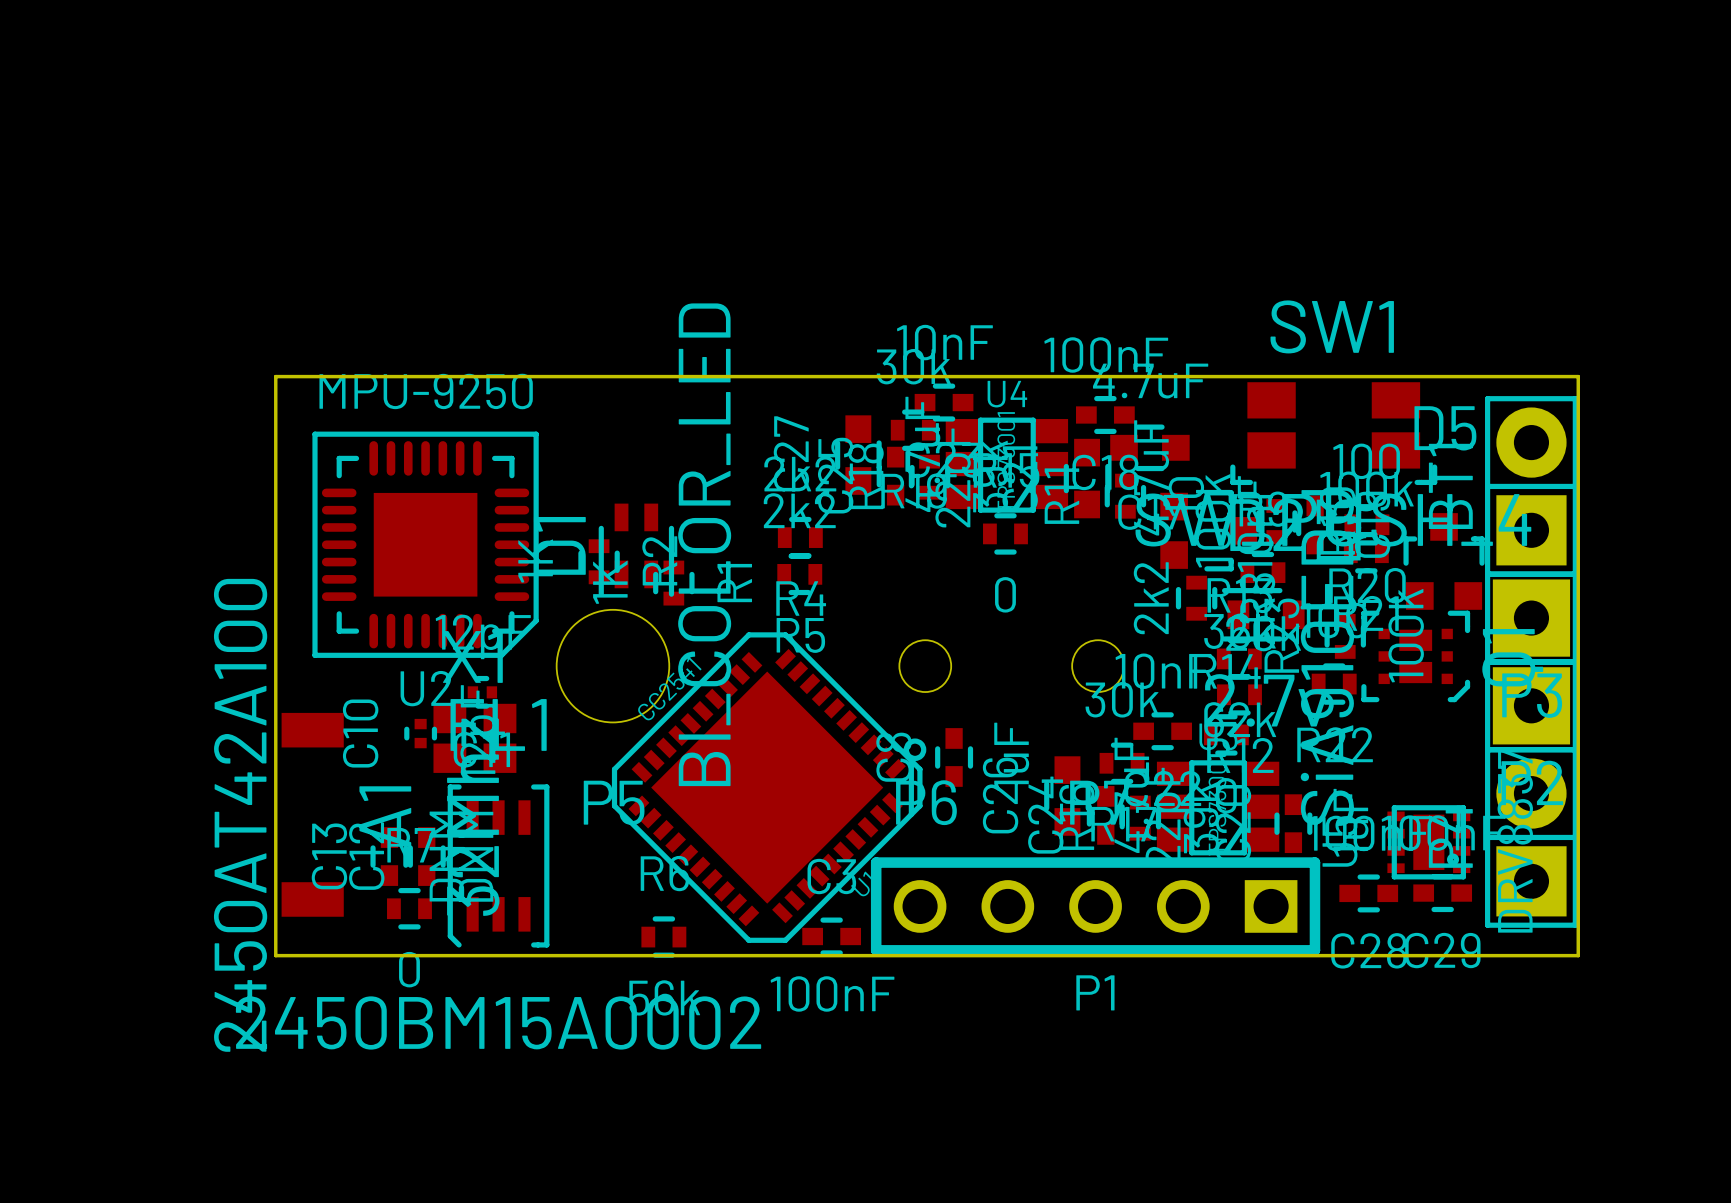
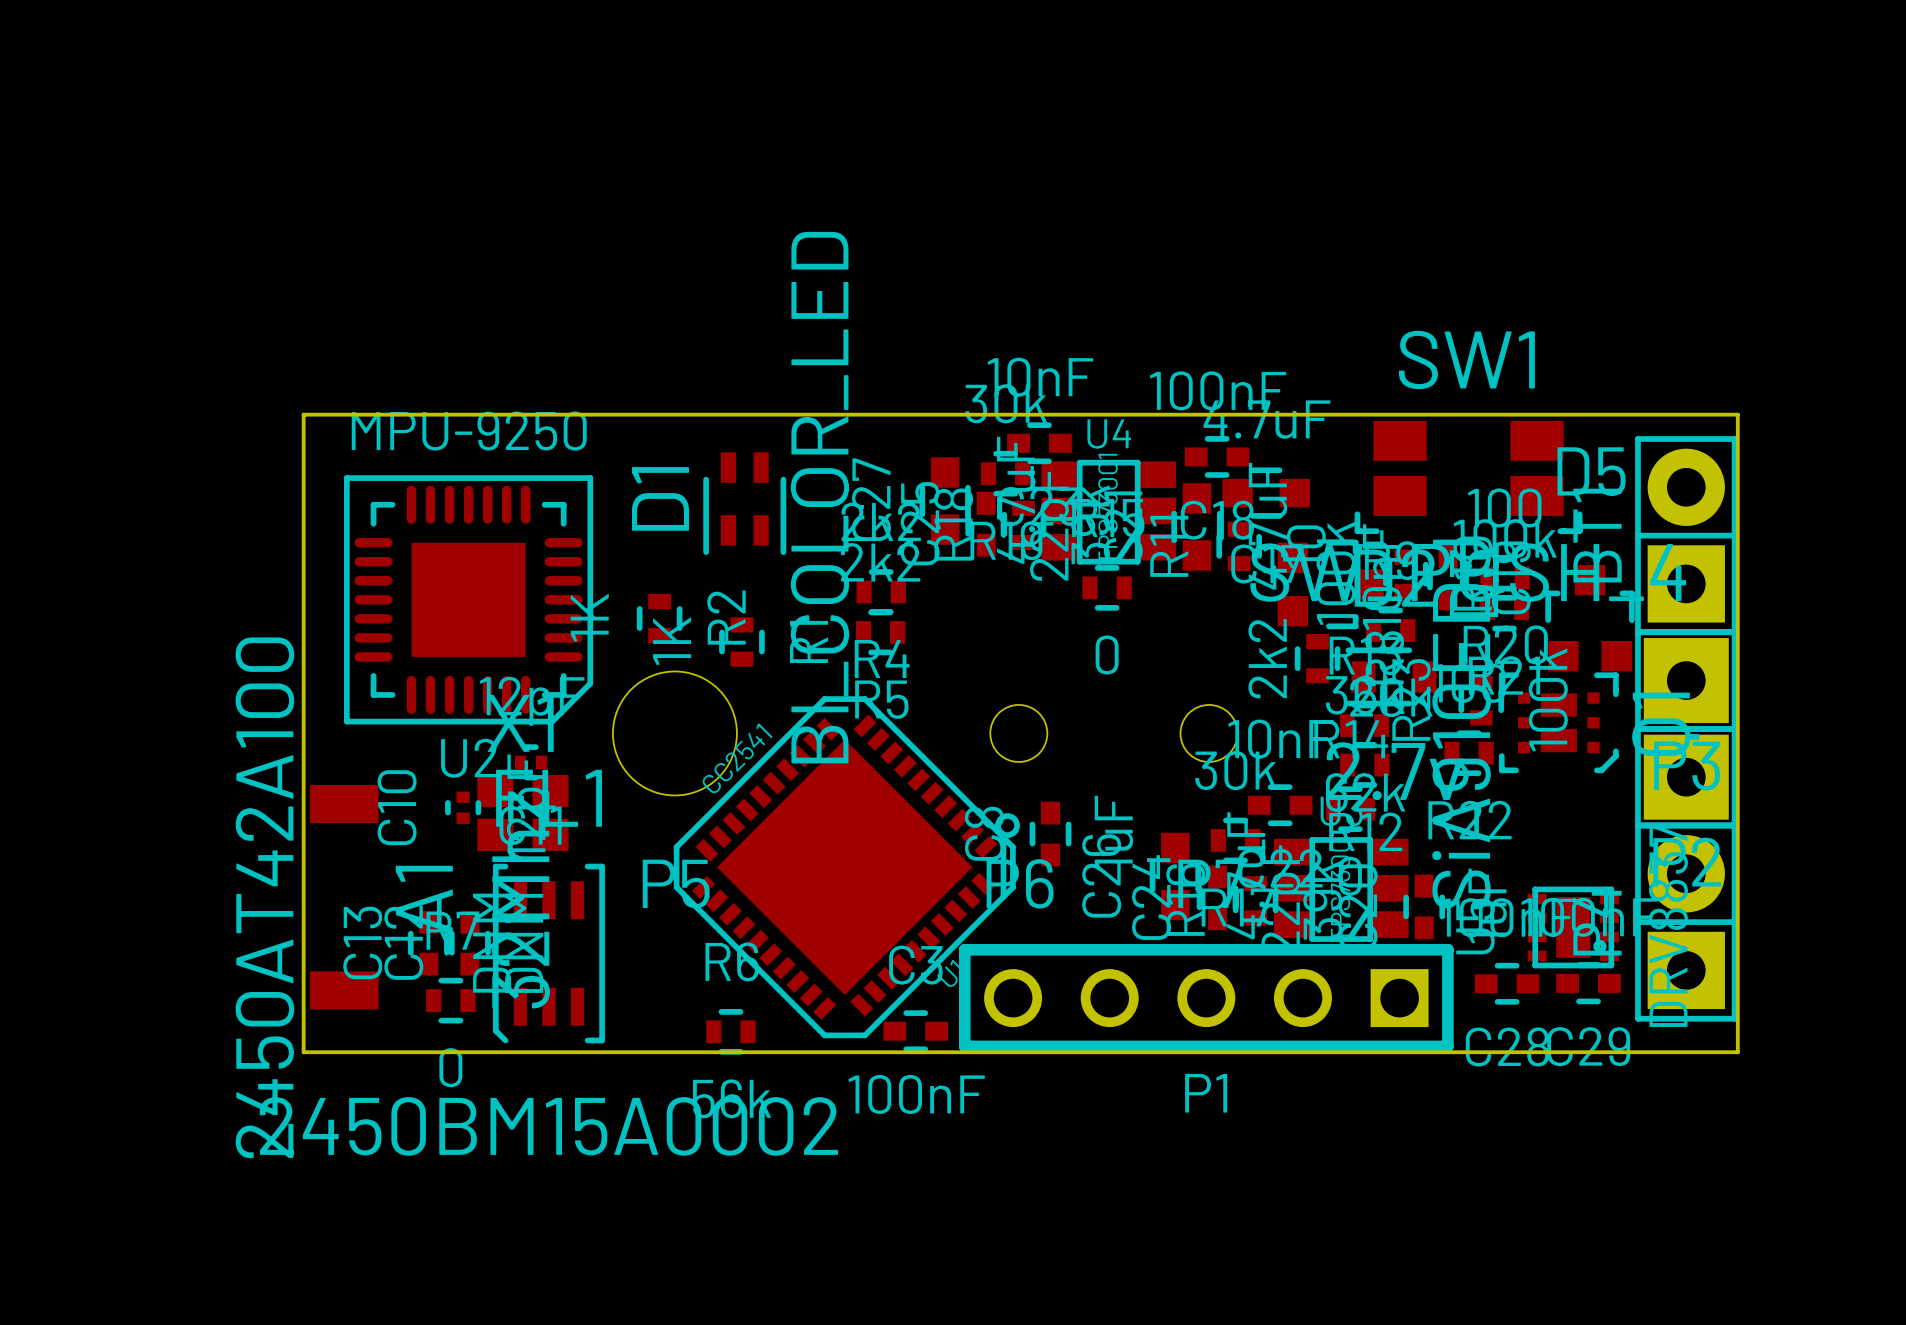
D1 position: (636, 550) -> (744, 503)

